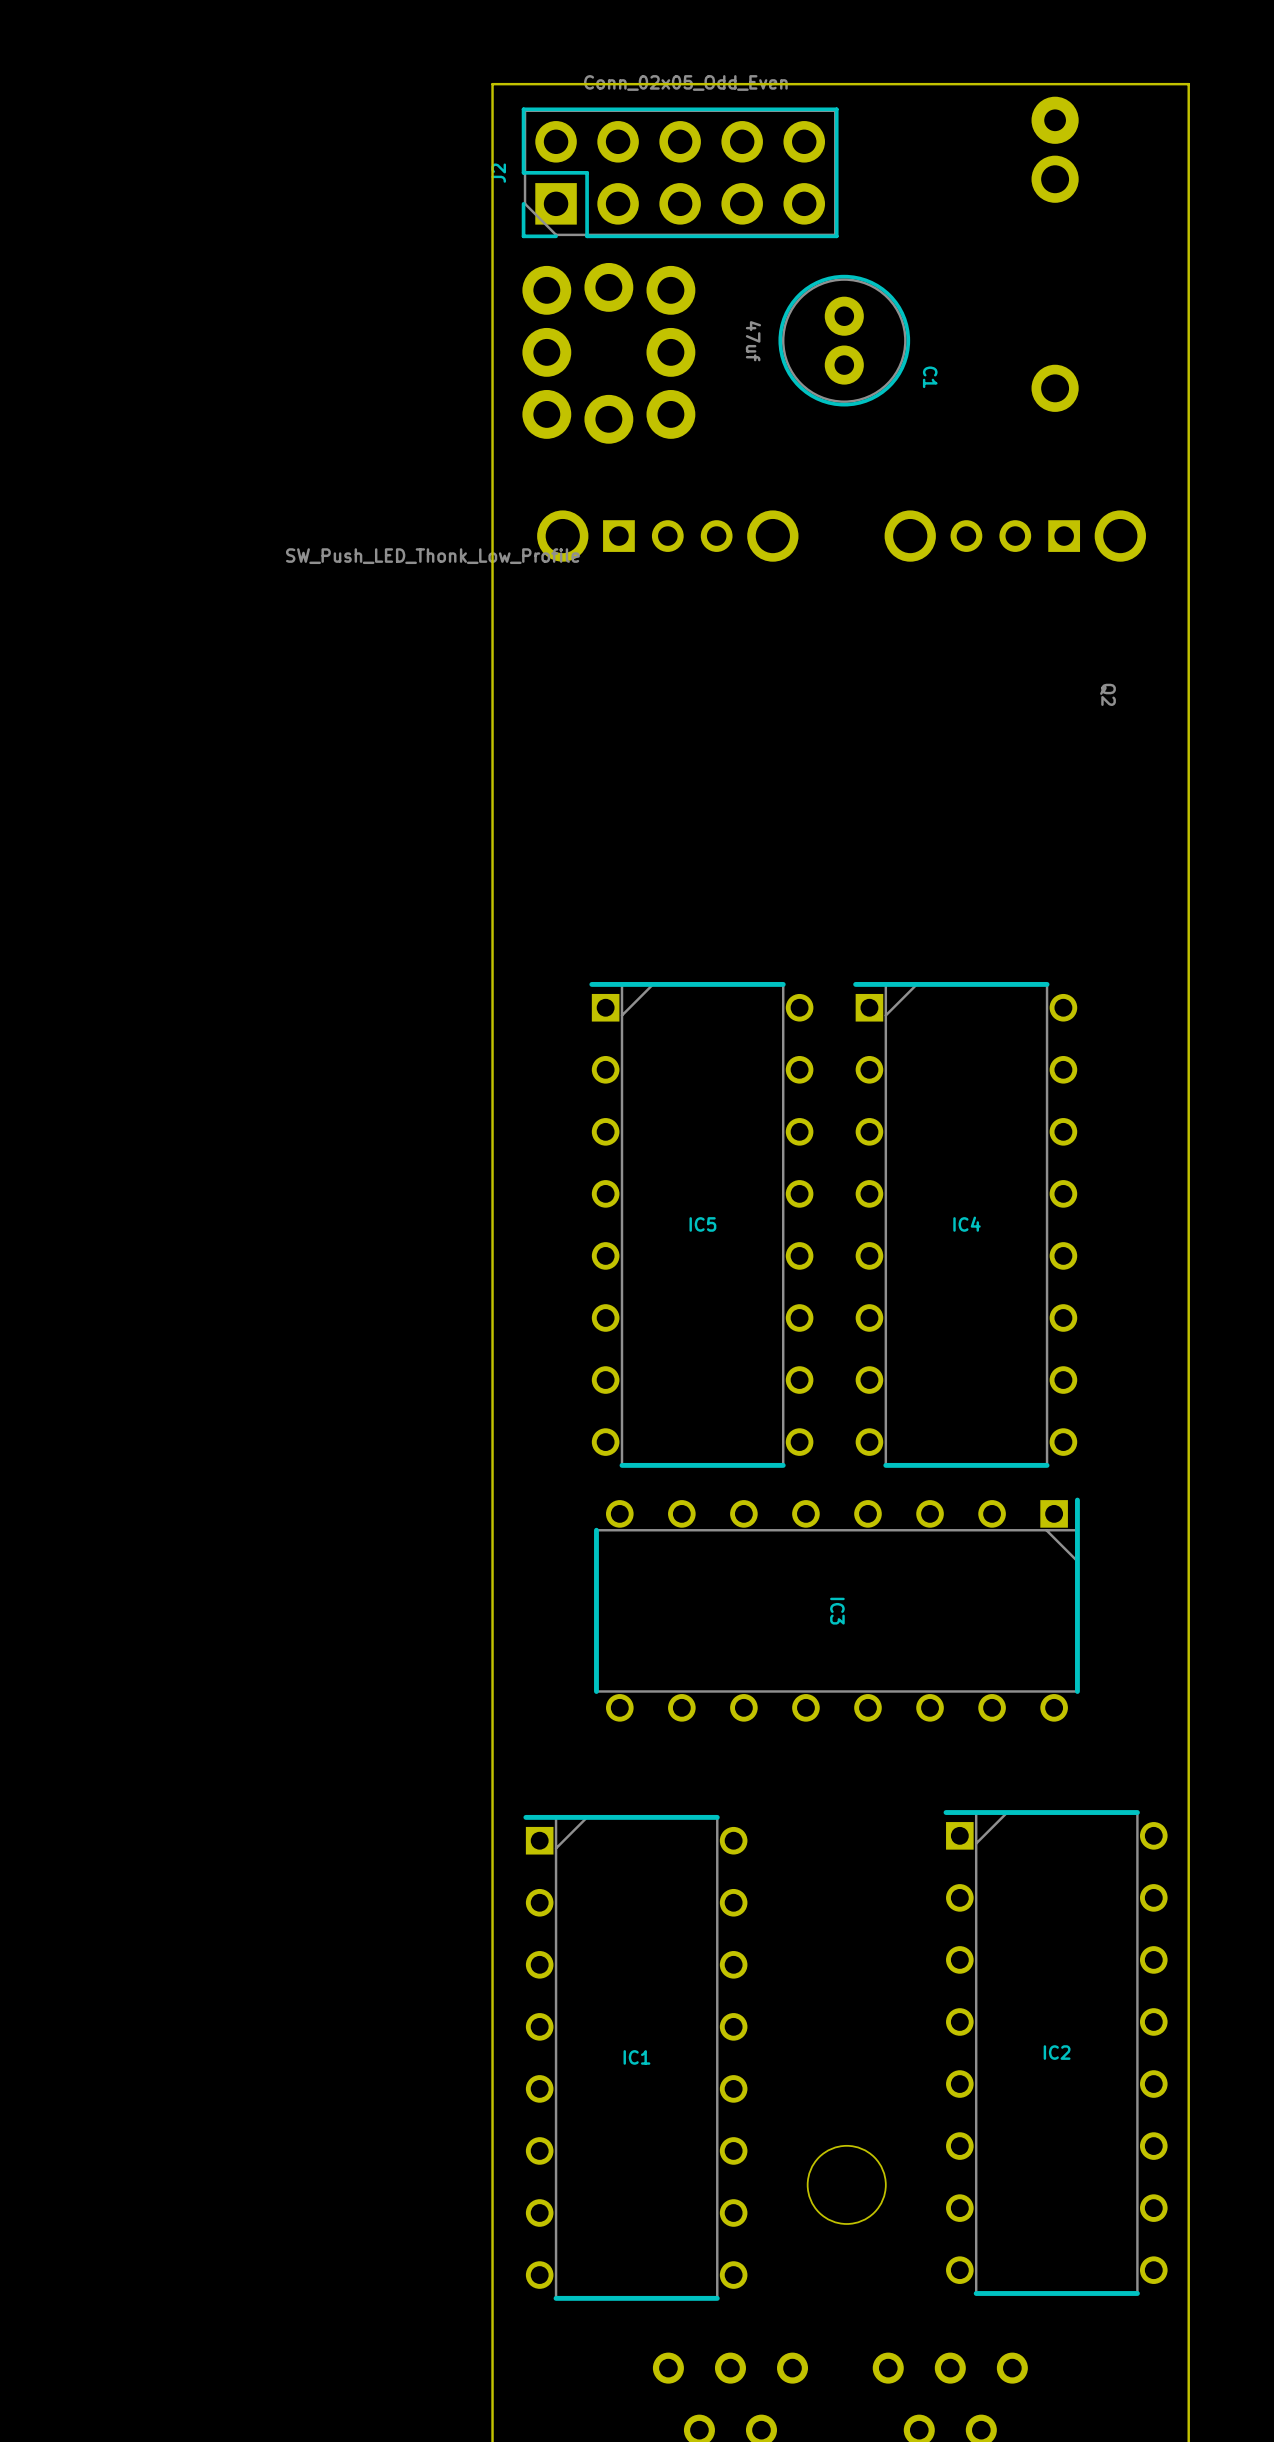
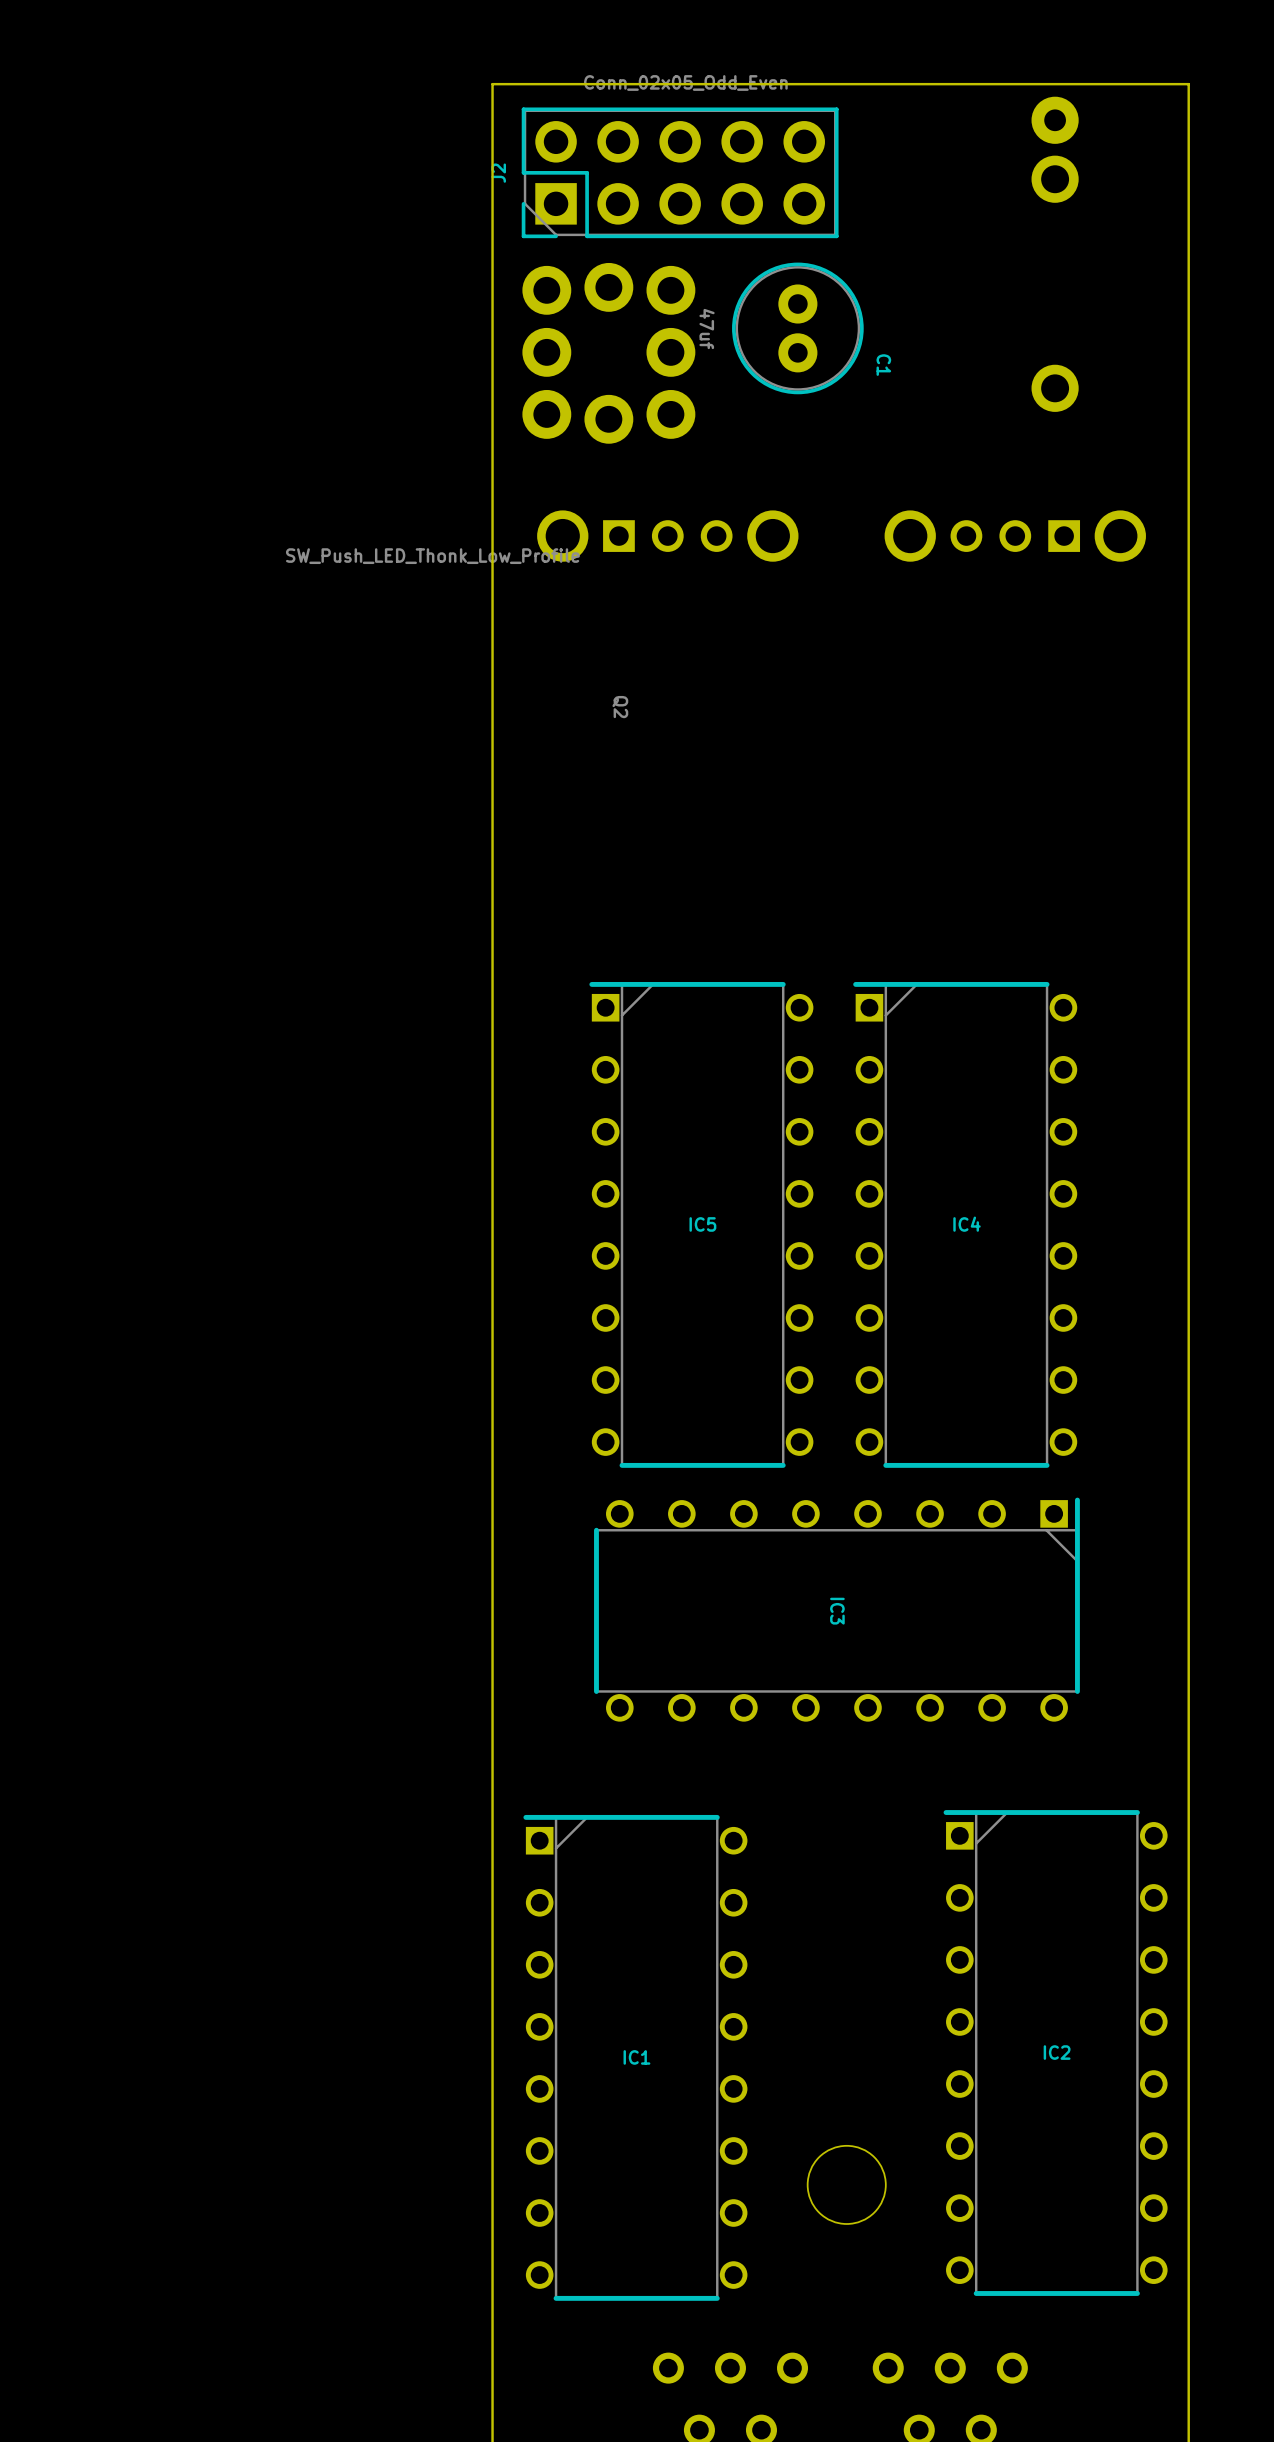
C1 position: (844, 340) -> (797, 328)
Q2 position: (1107, 694) -> (620, 707)

